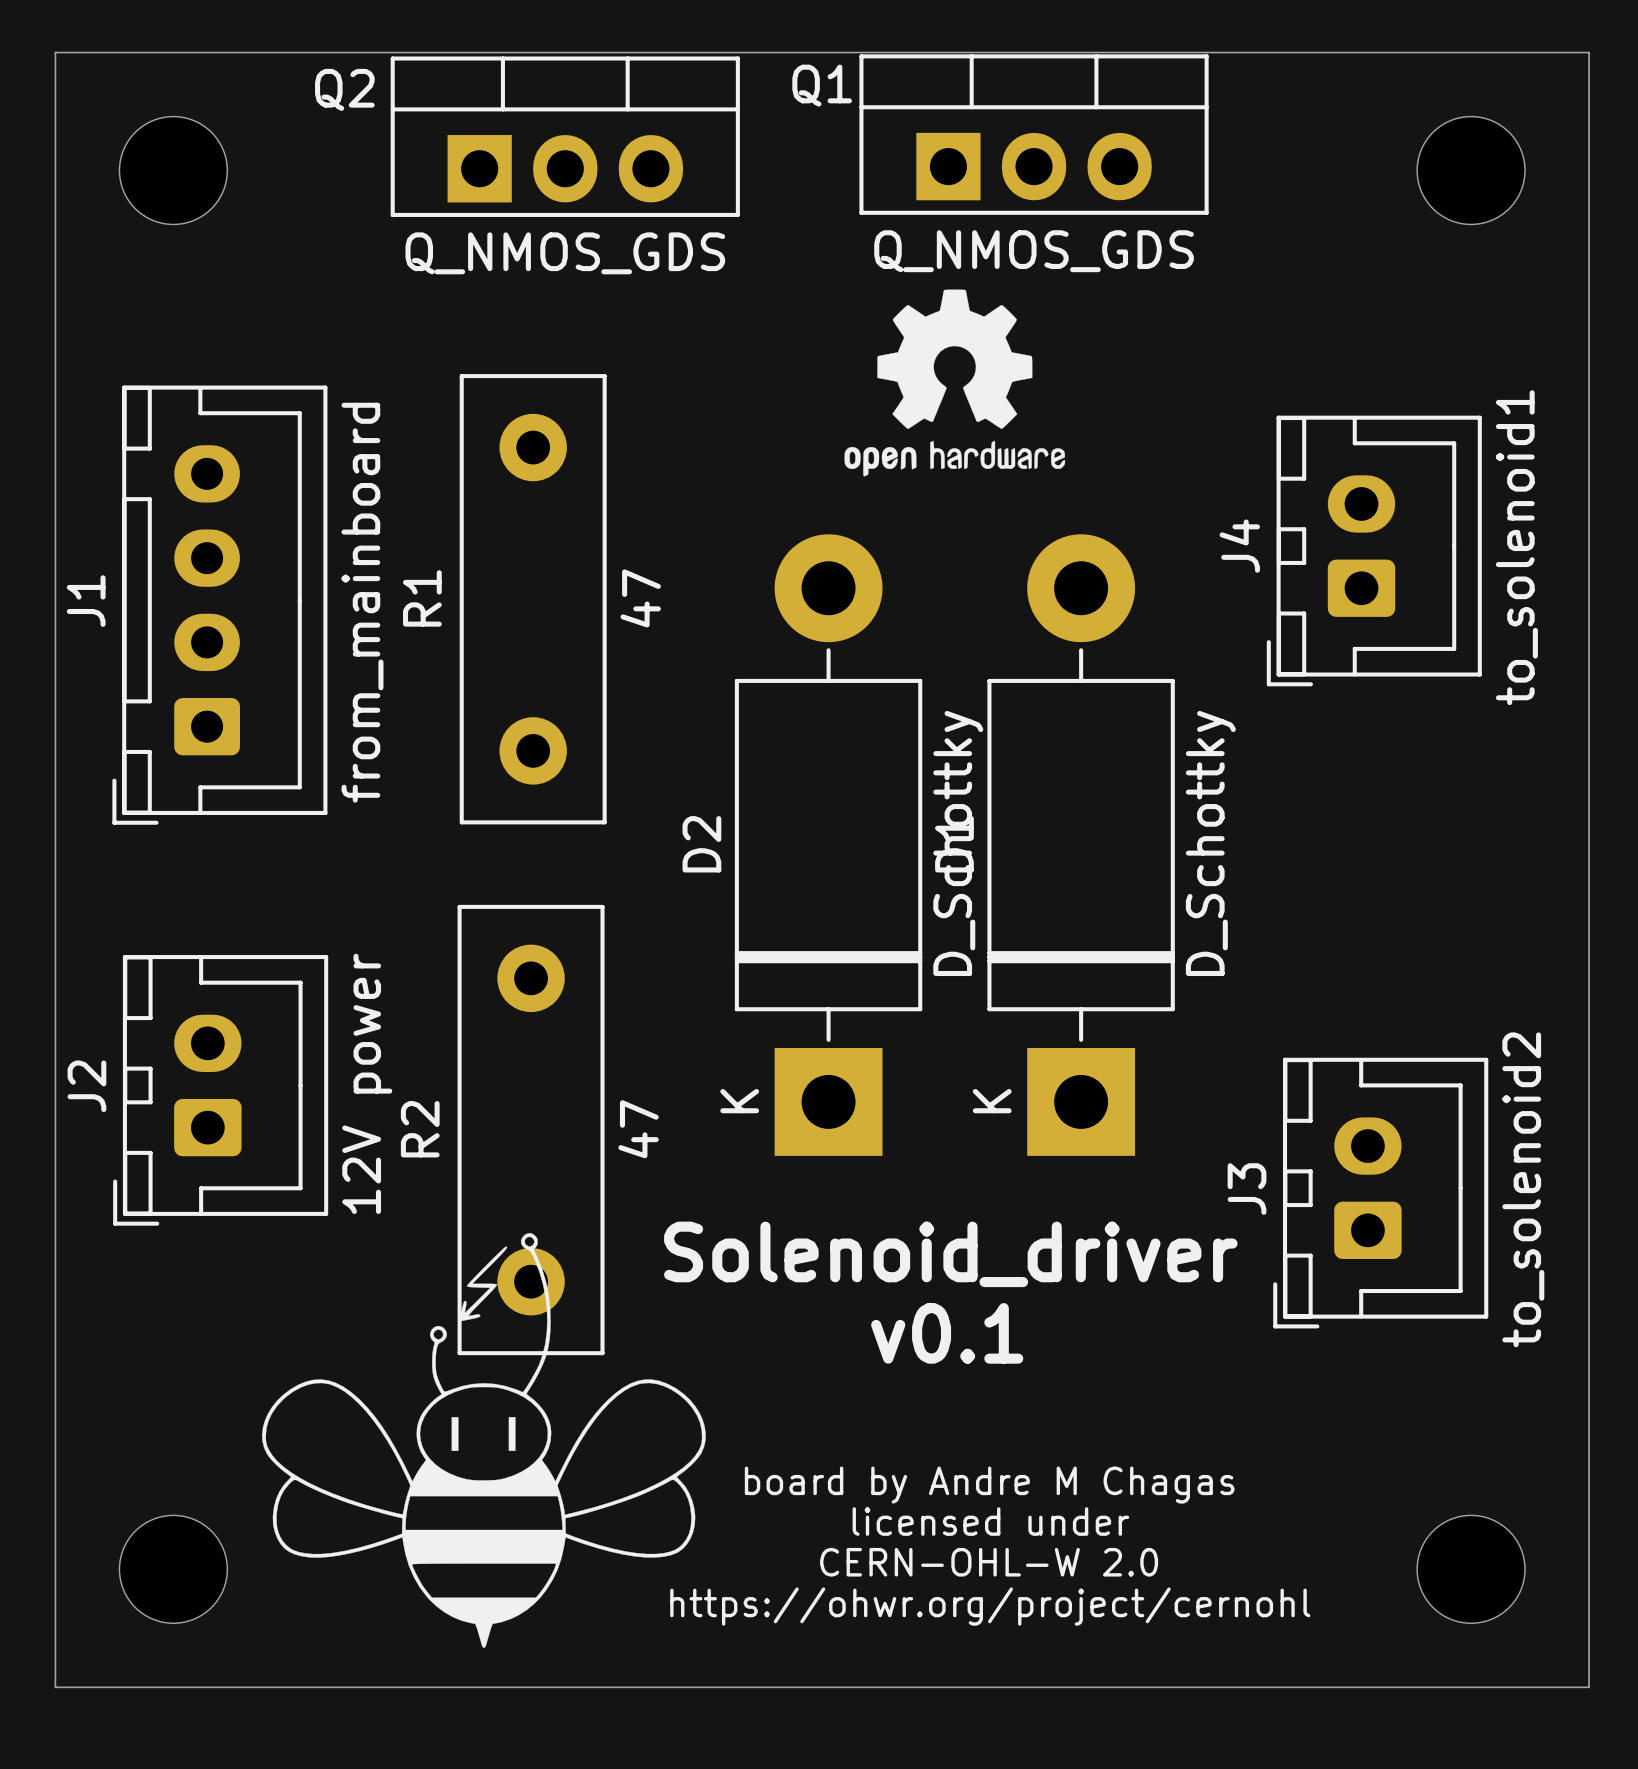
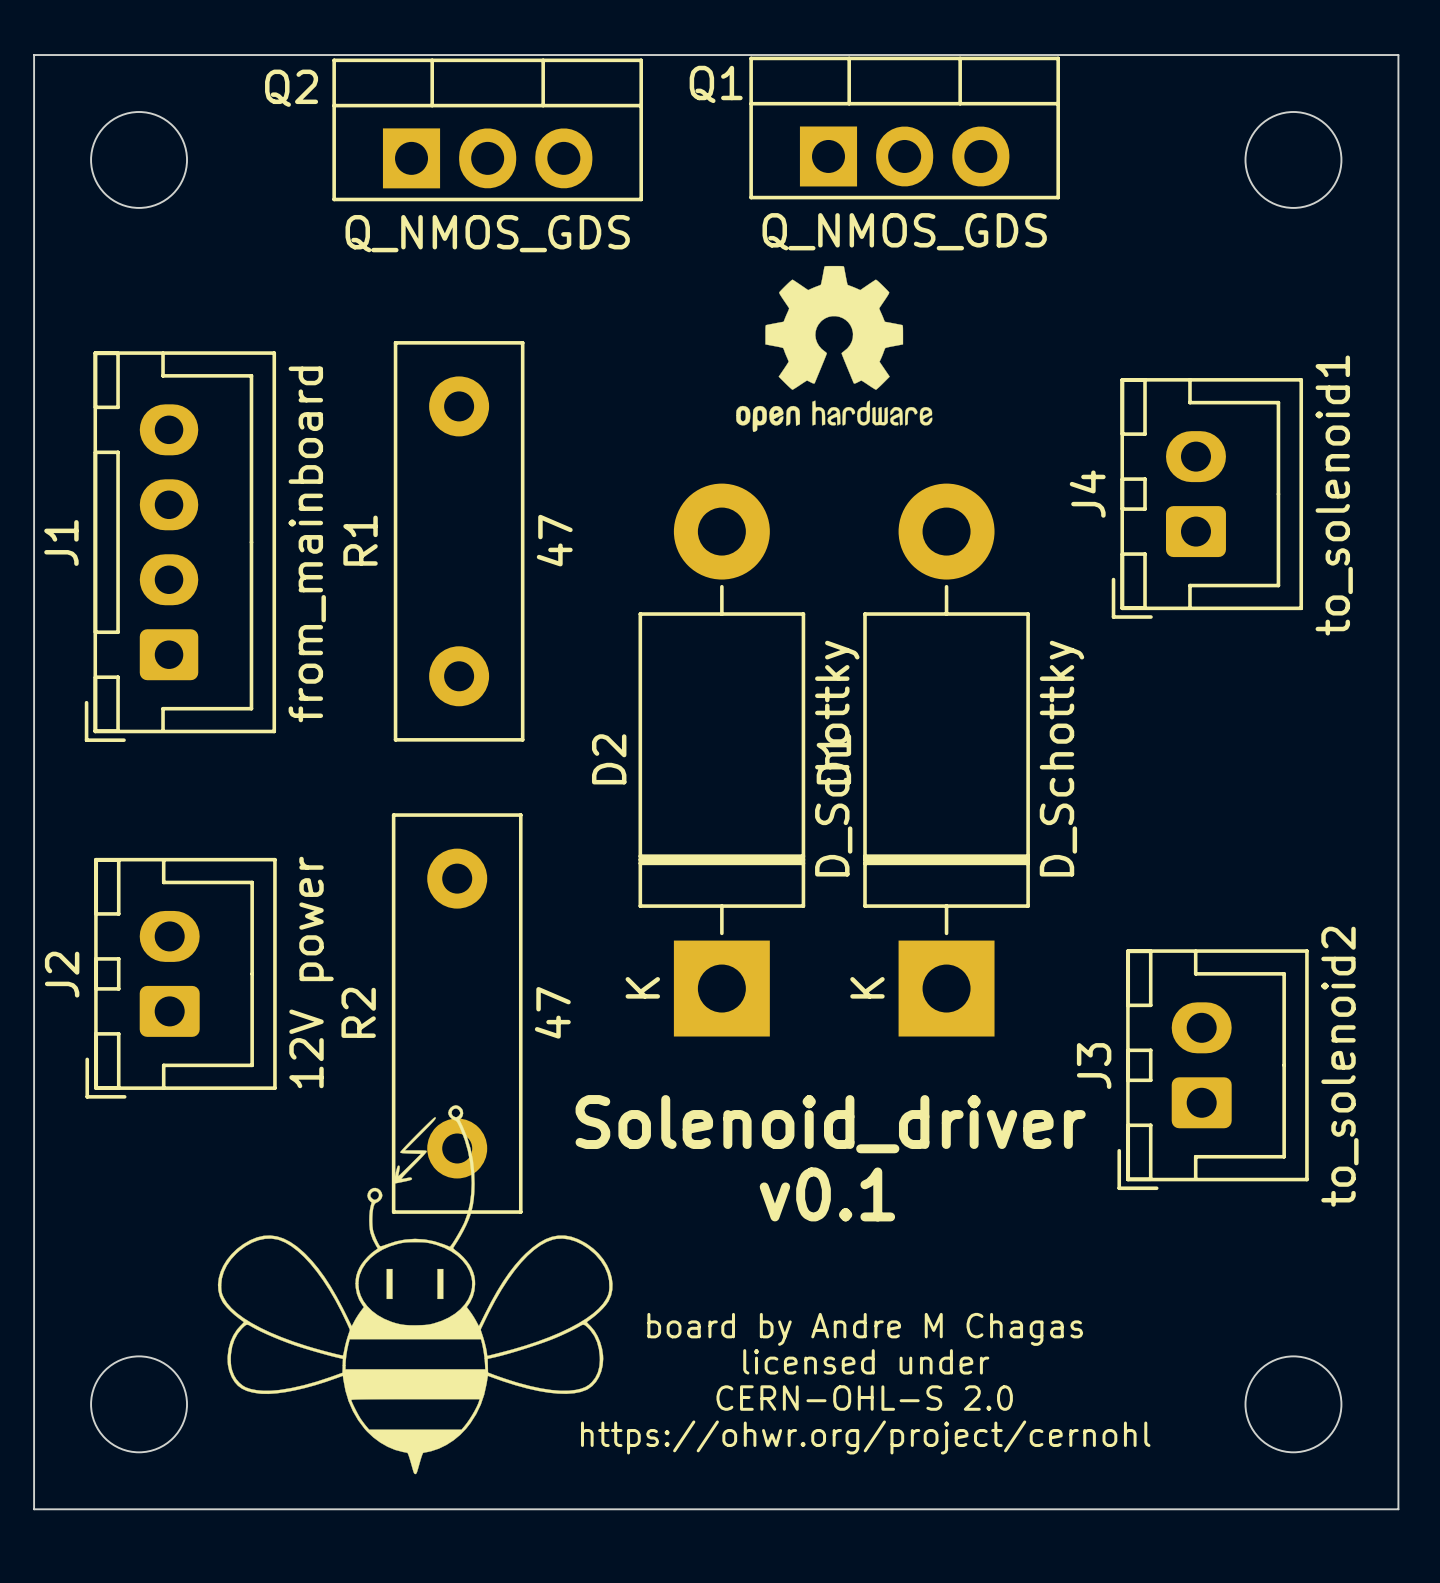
text: CERN-OHL-W 2.0 (989, 1562) -> CERN-OHL-S 2.0 (864, 1398)

